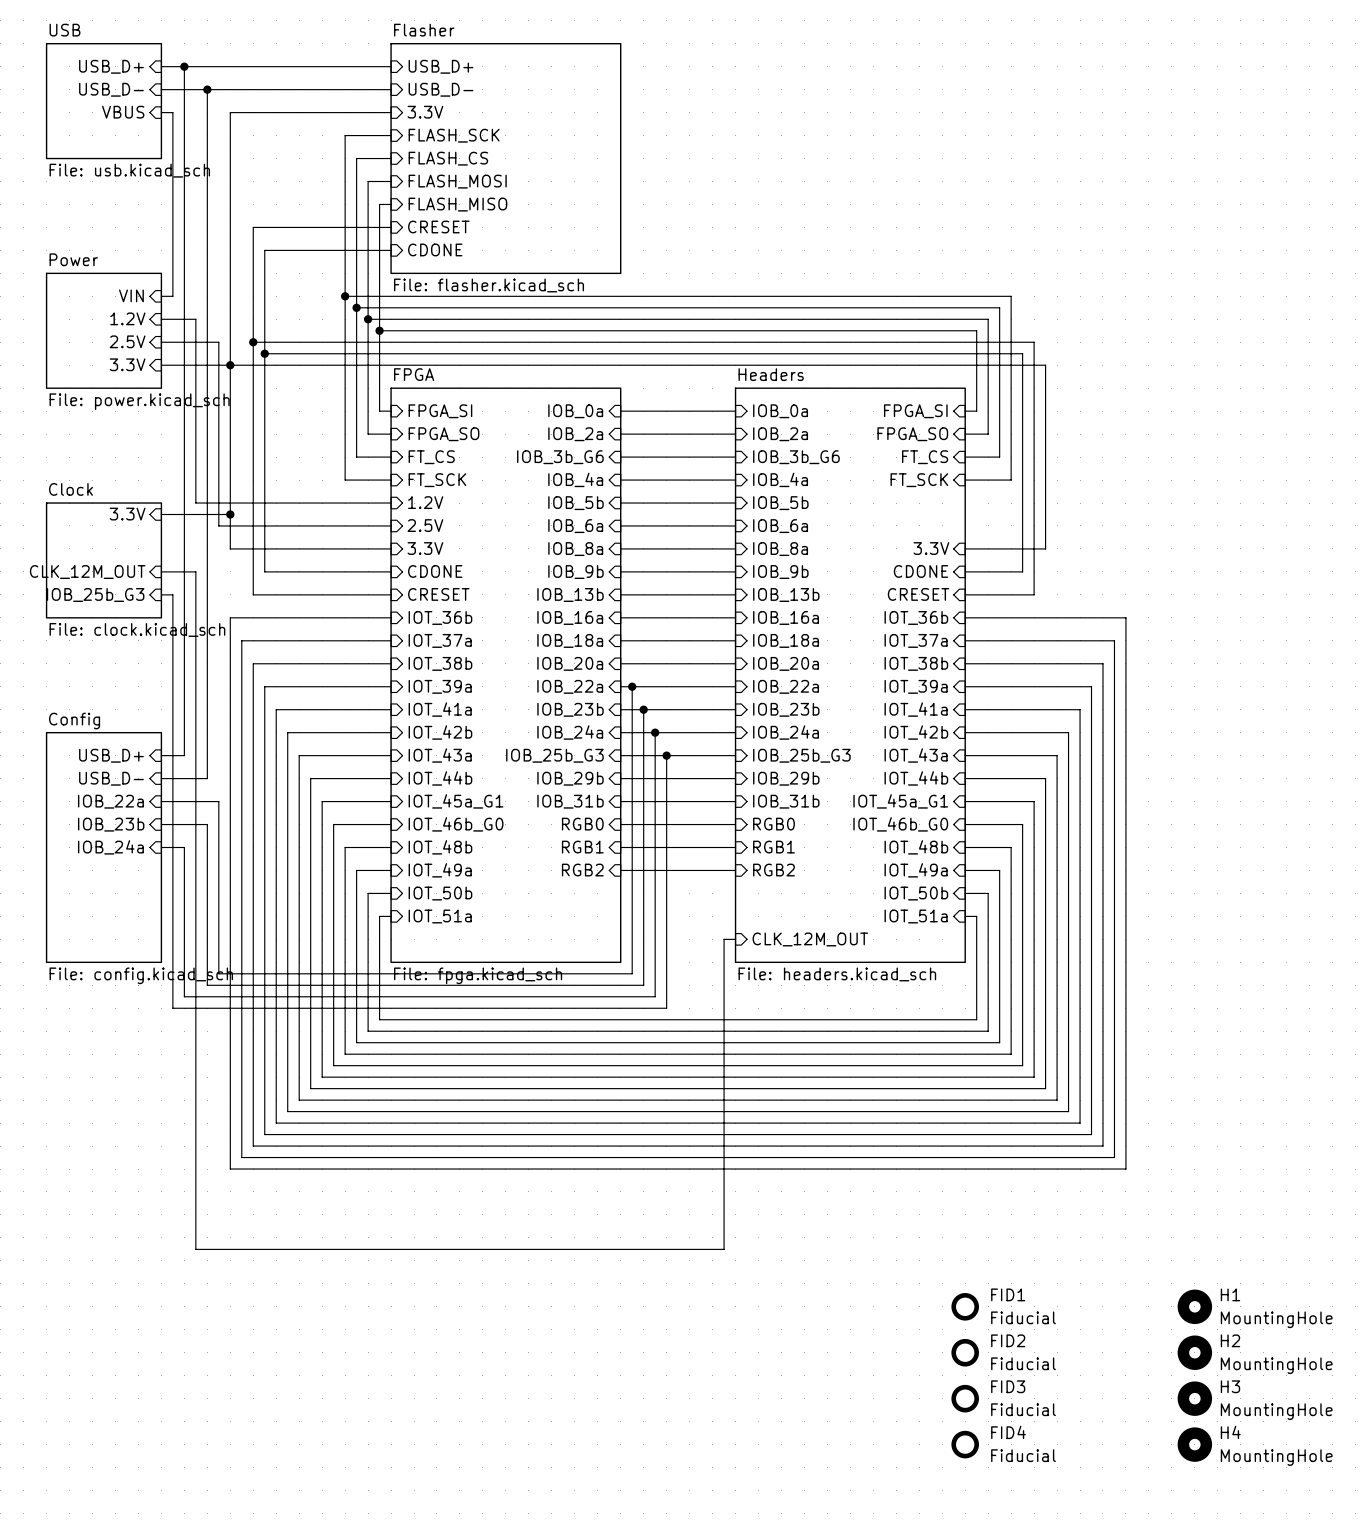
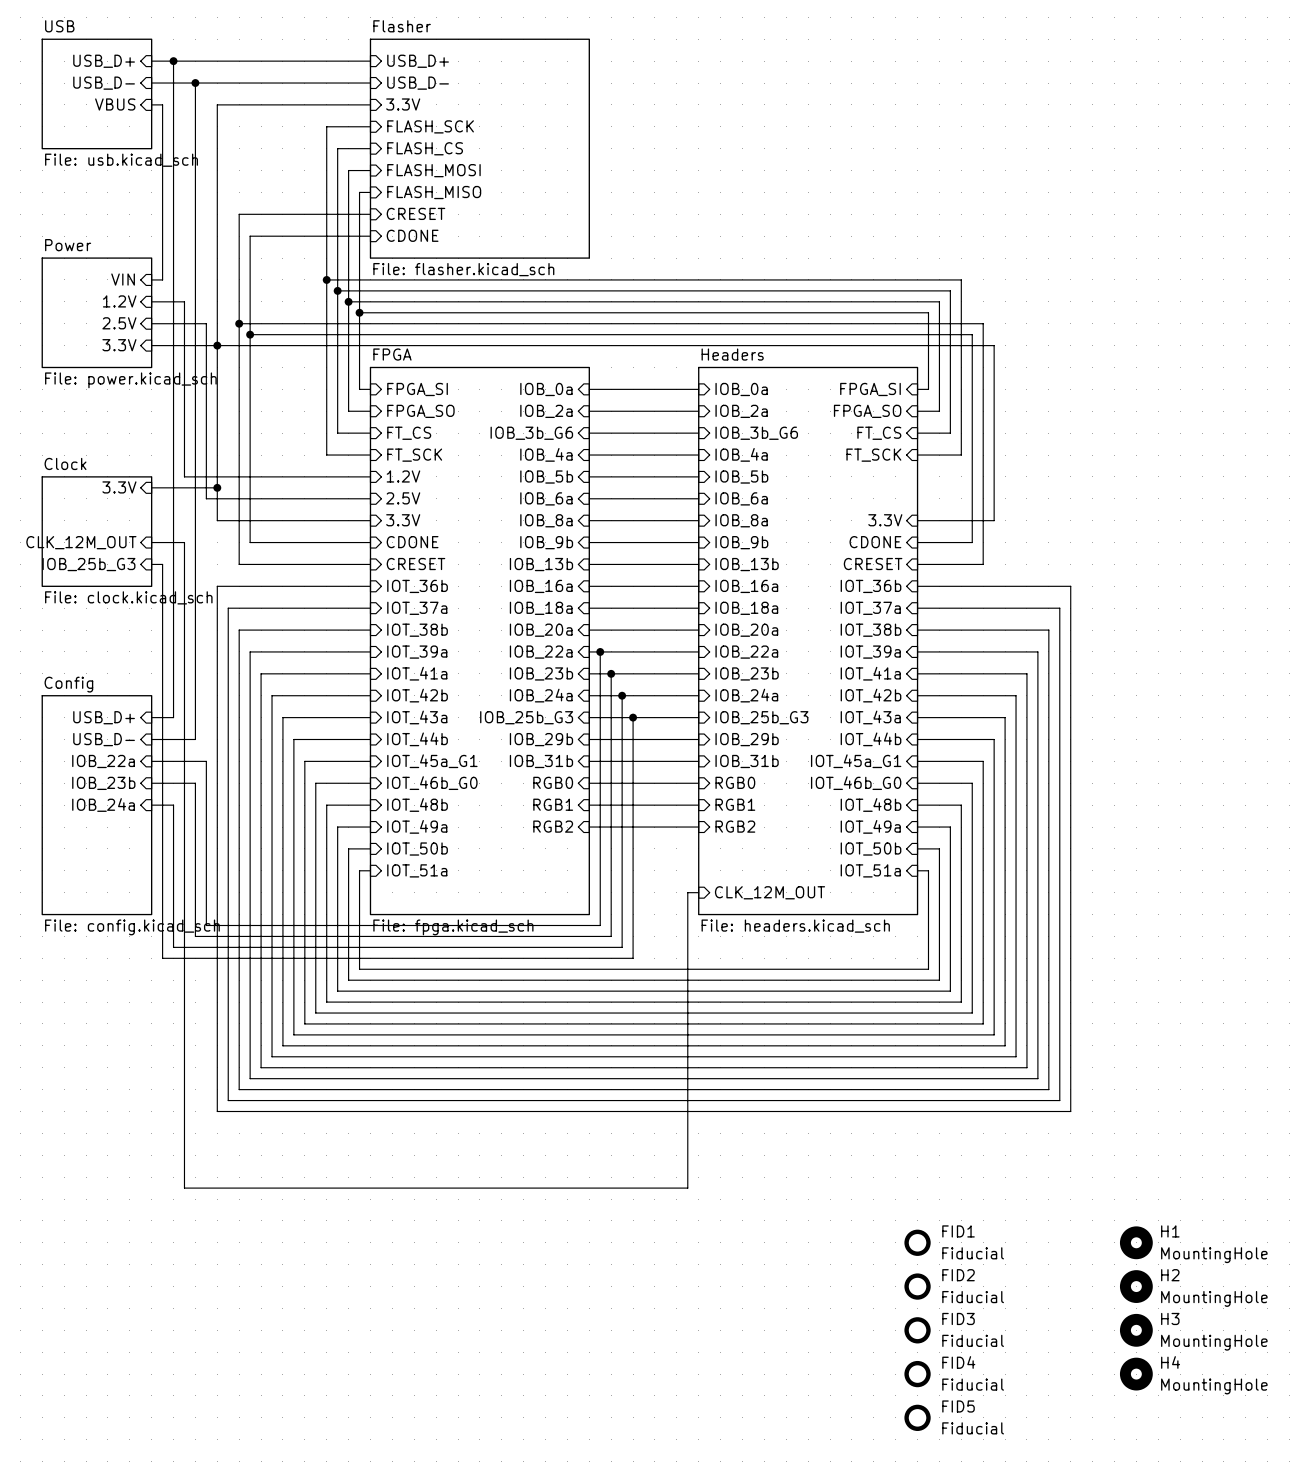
FID5: none -> Fiducial (917, 1417)

